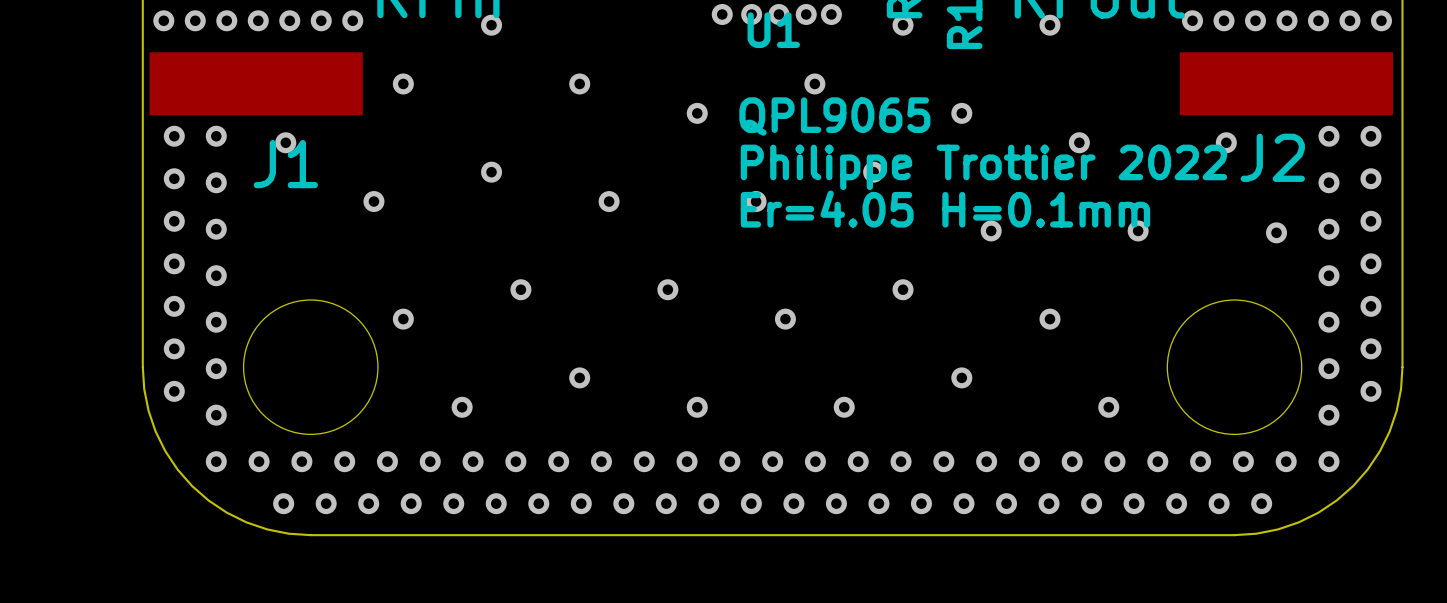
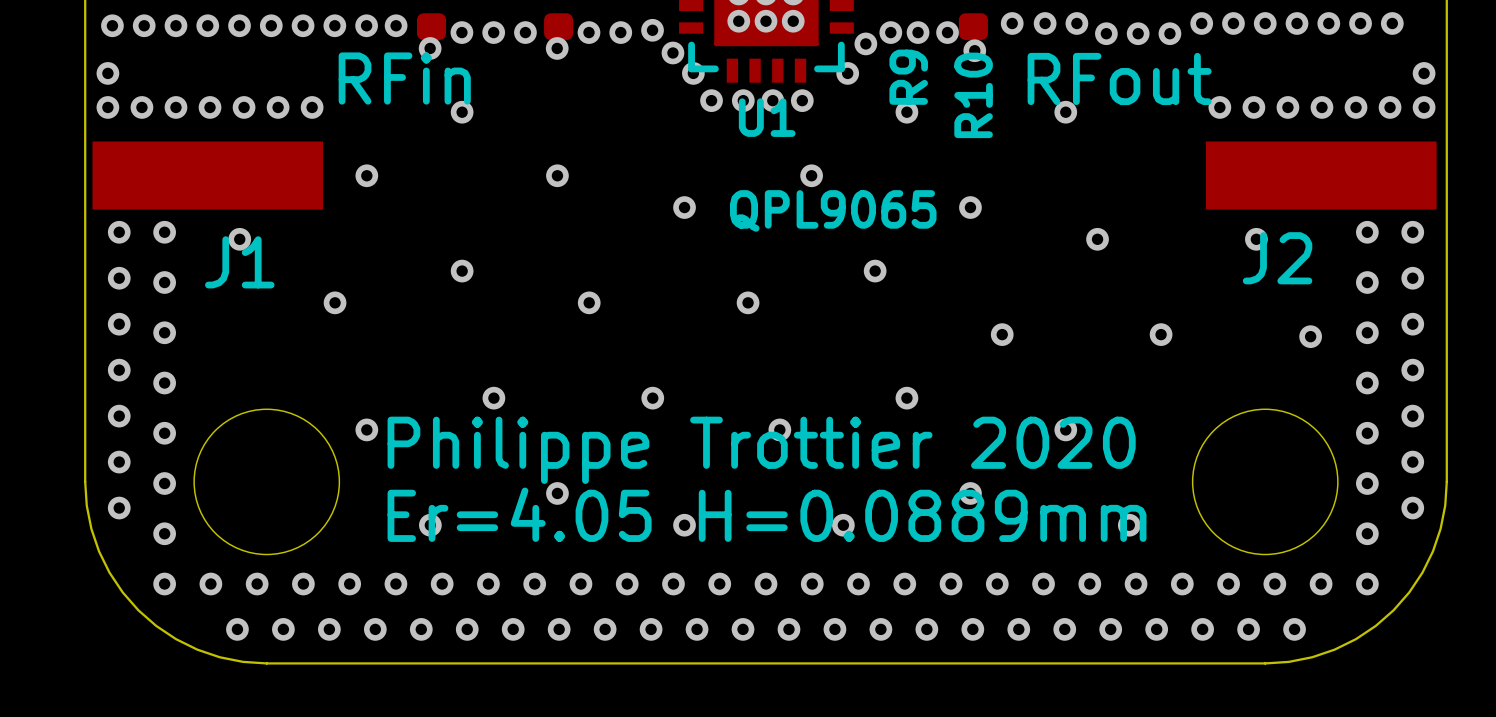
via: (831, 14) -> none
J2 name position: J2 (1272, 157) -> J2 (1277, 258)
text: Philippe Trottier 2022 (983, 167) -> none
text: Er=4.05 H=0.1mm (945, 209) -> none
text: none -> Philippe Trottier 2020 (761, 450)
text: none -> Er=4.05 H=0.0889mm (767, 514)

